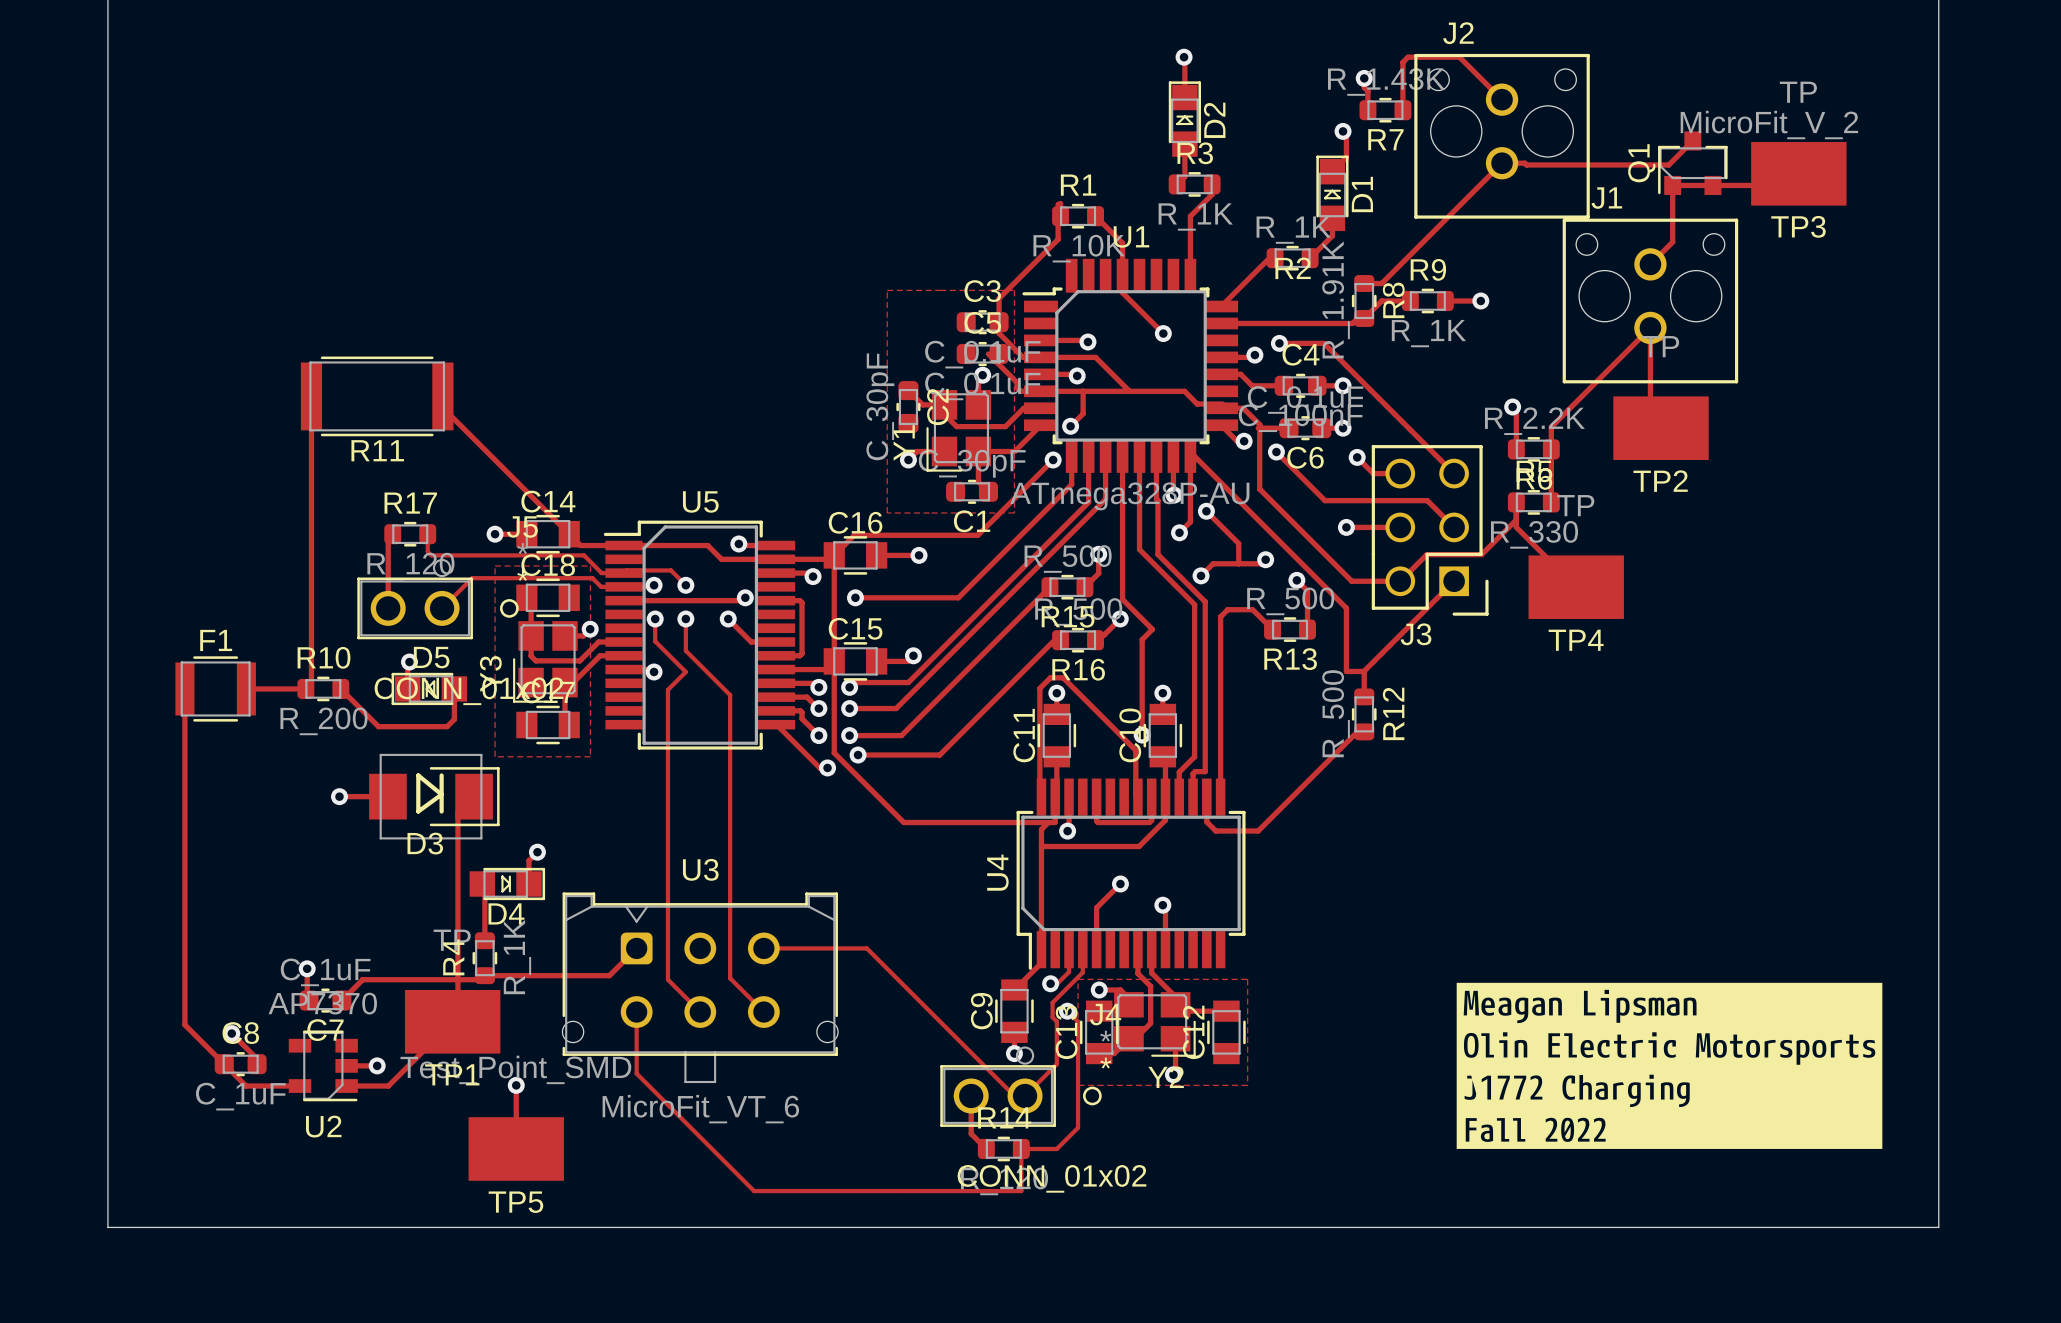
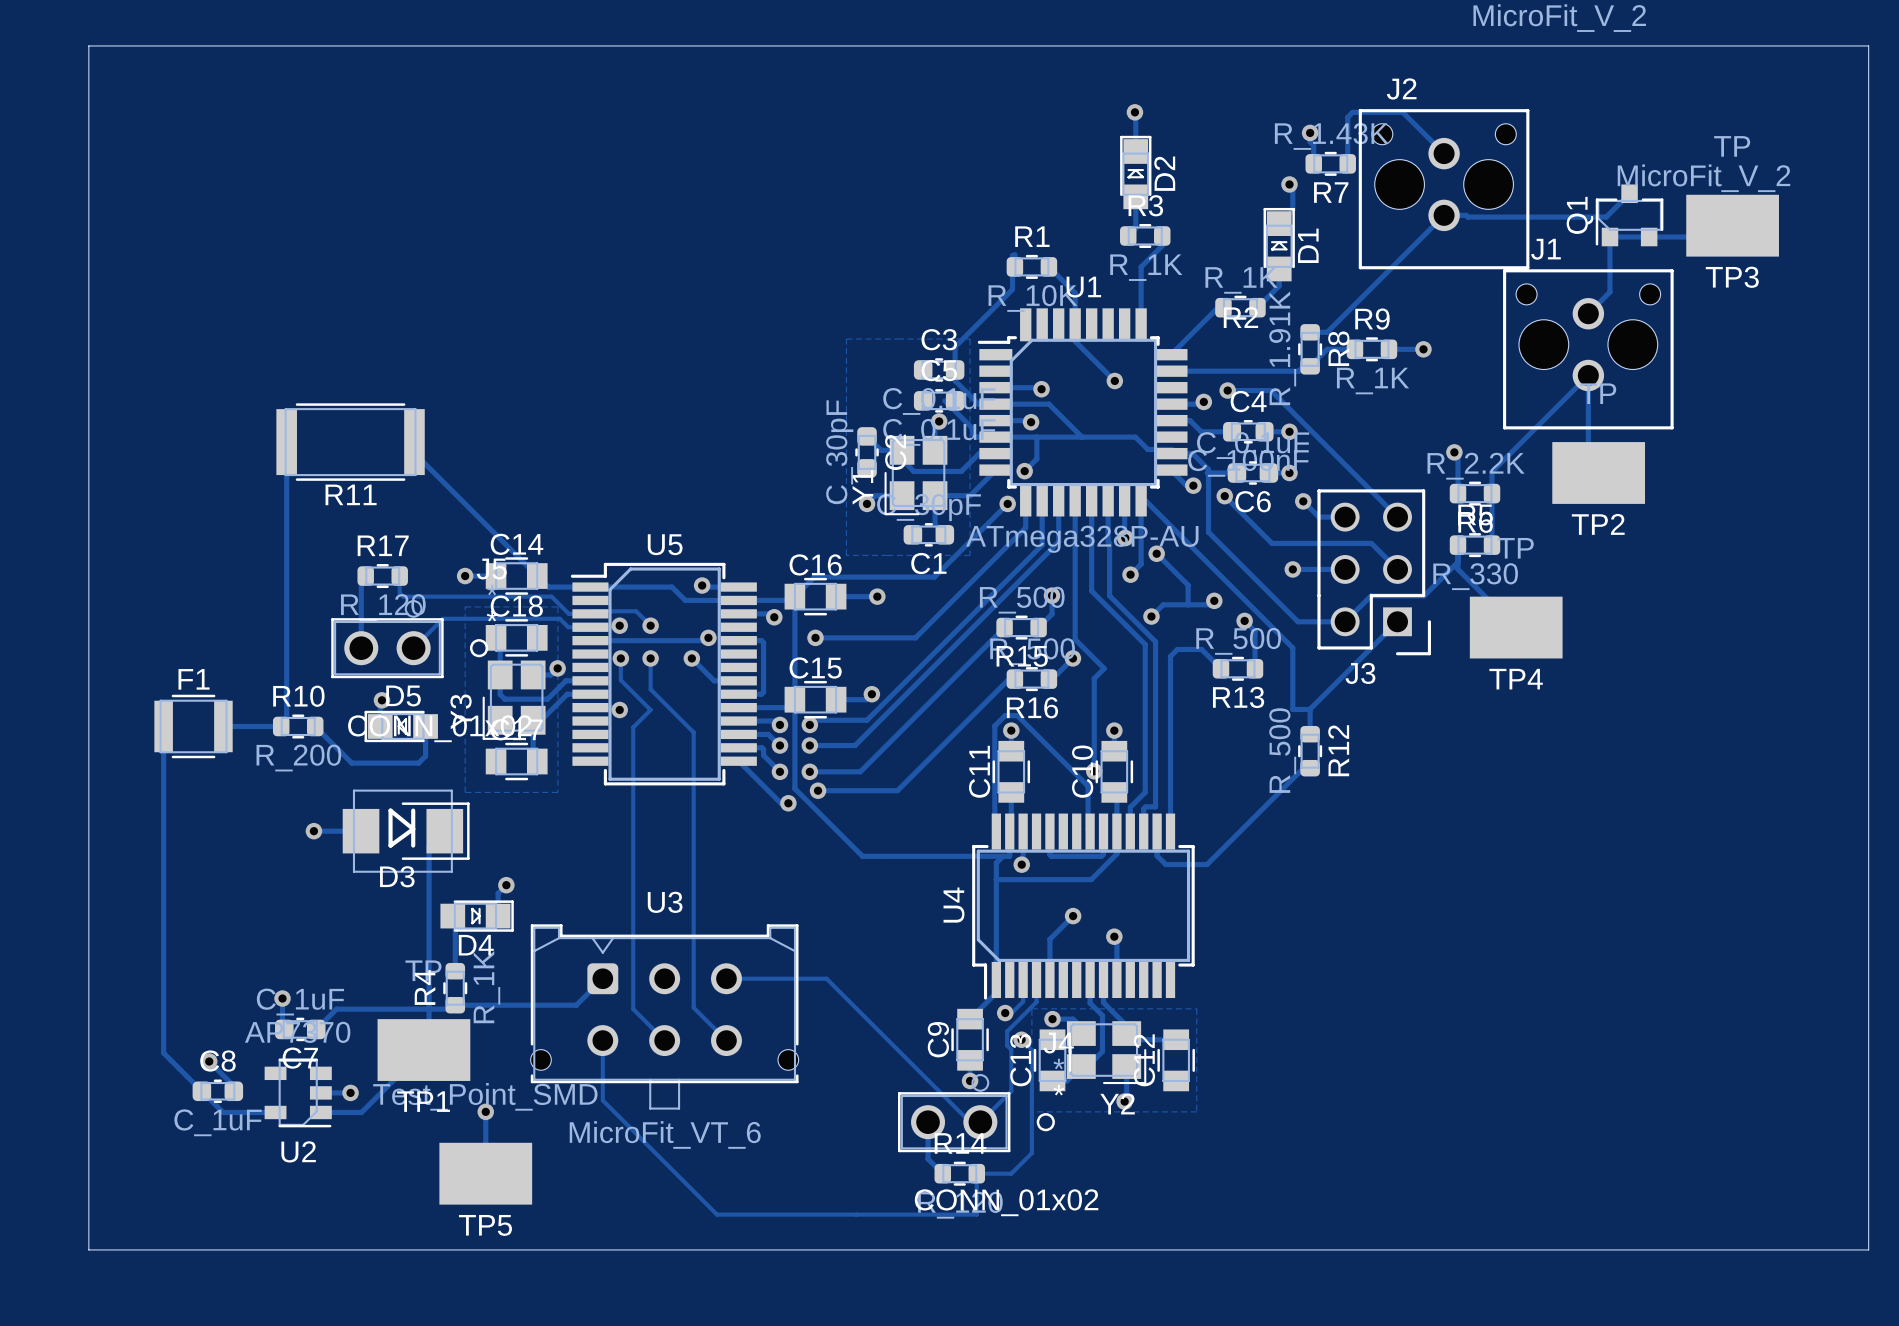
drawing: [1456, 982, 1883, 1149] -> none

